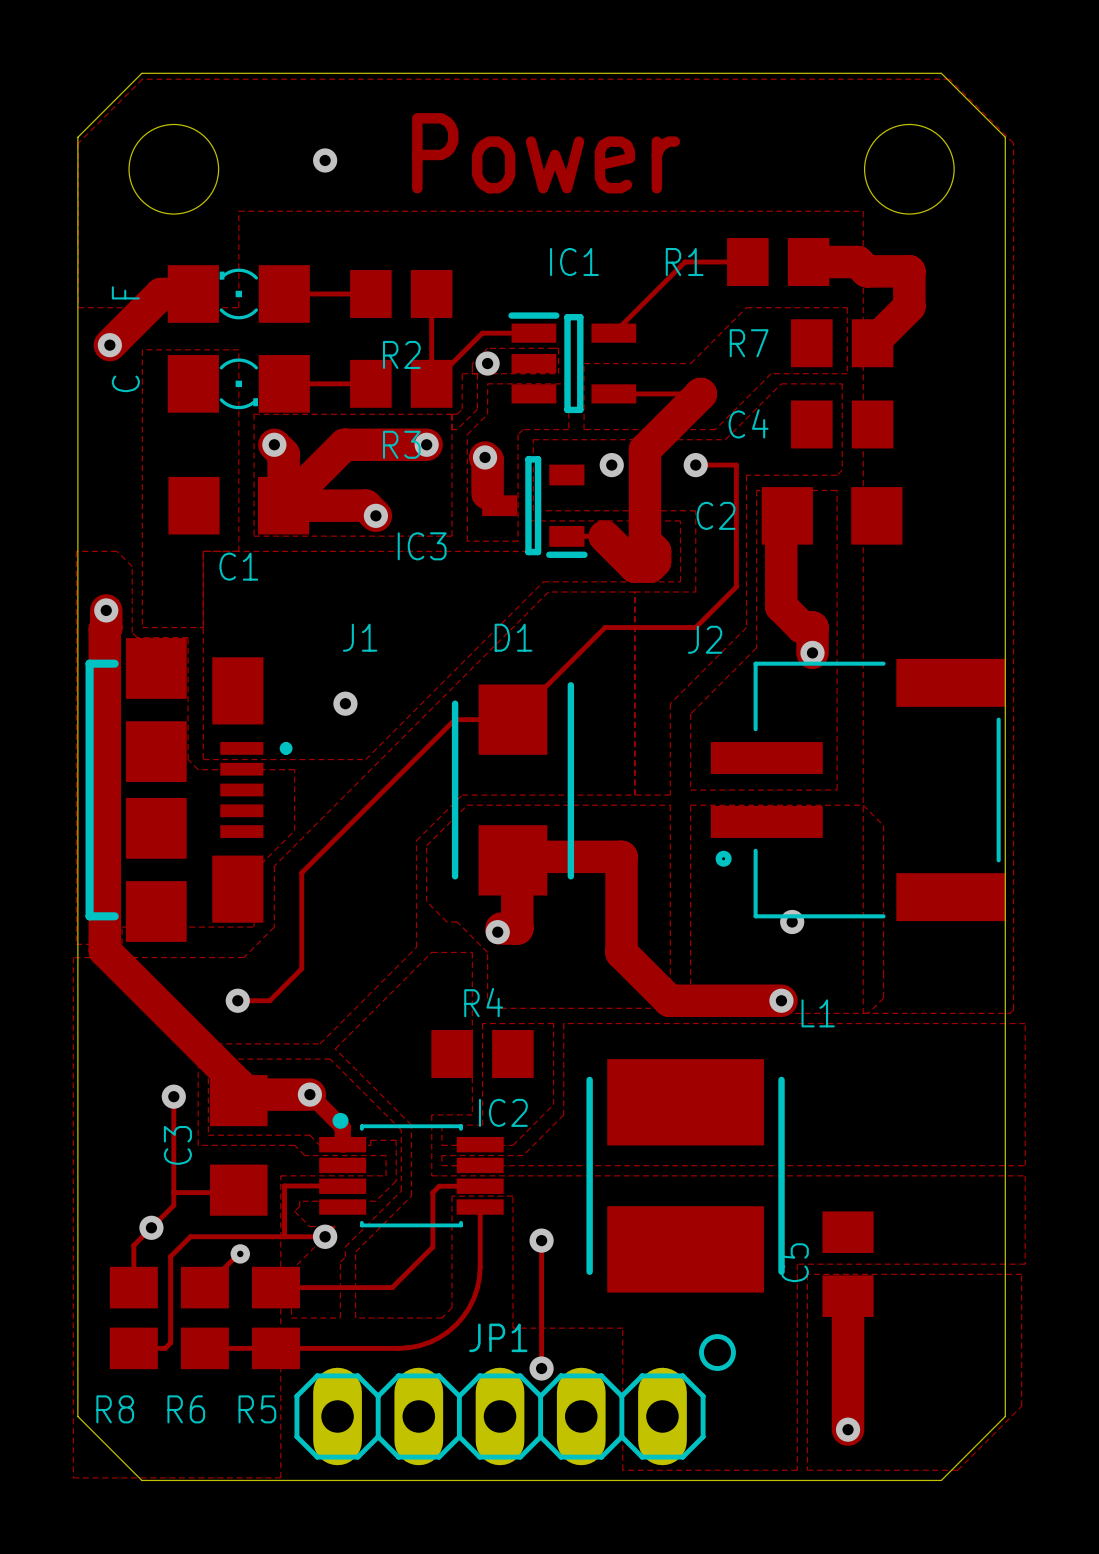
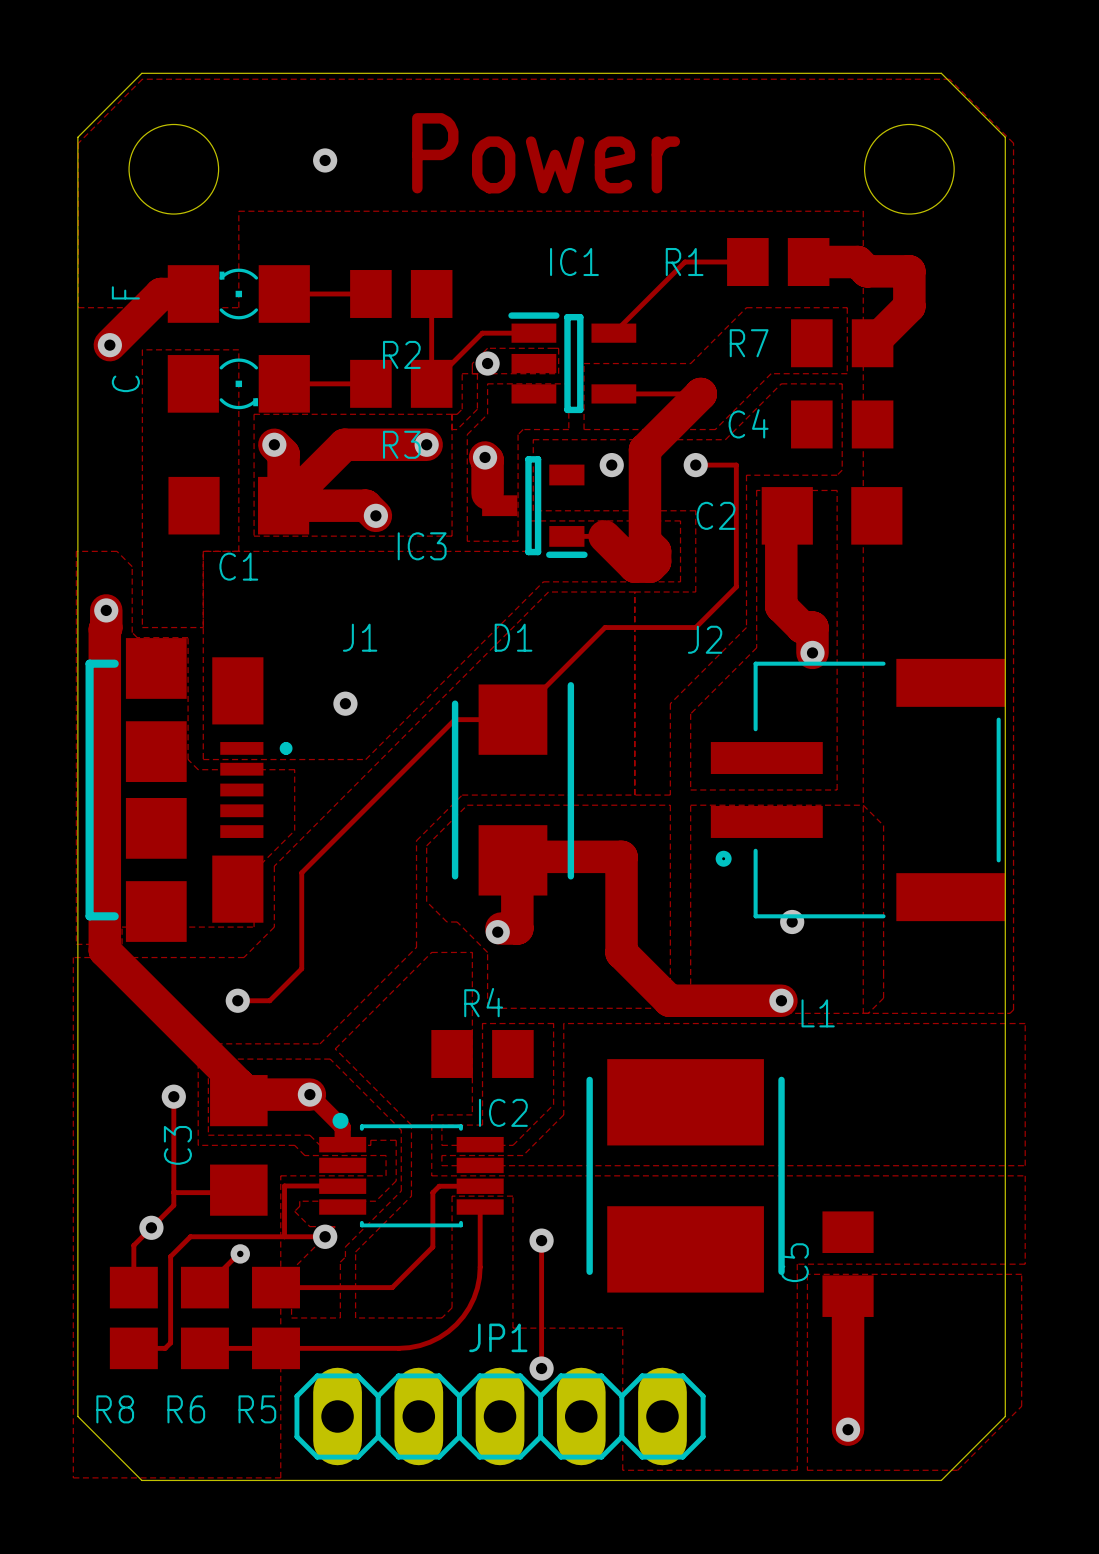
drawing: [699, 1334, 736, 1371] -> none

